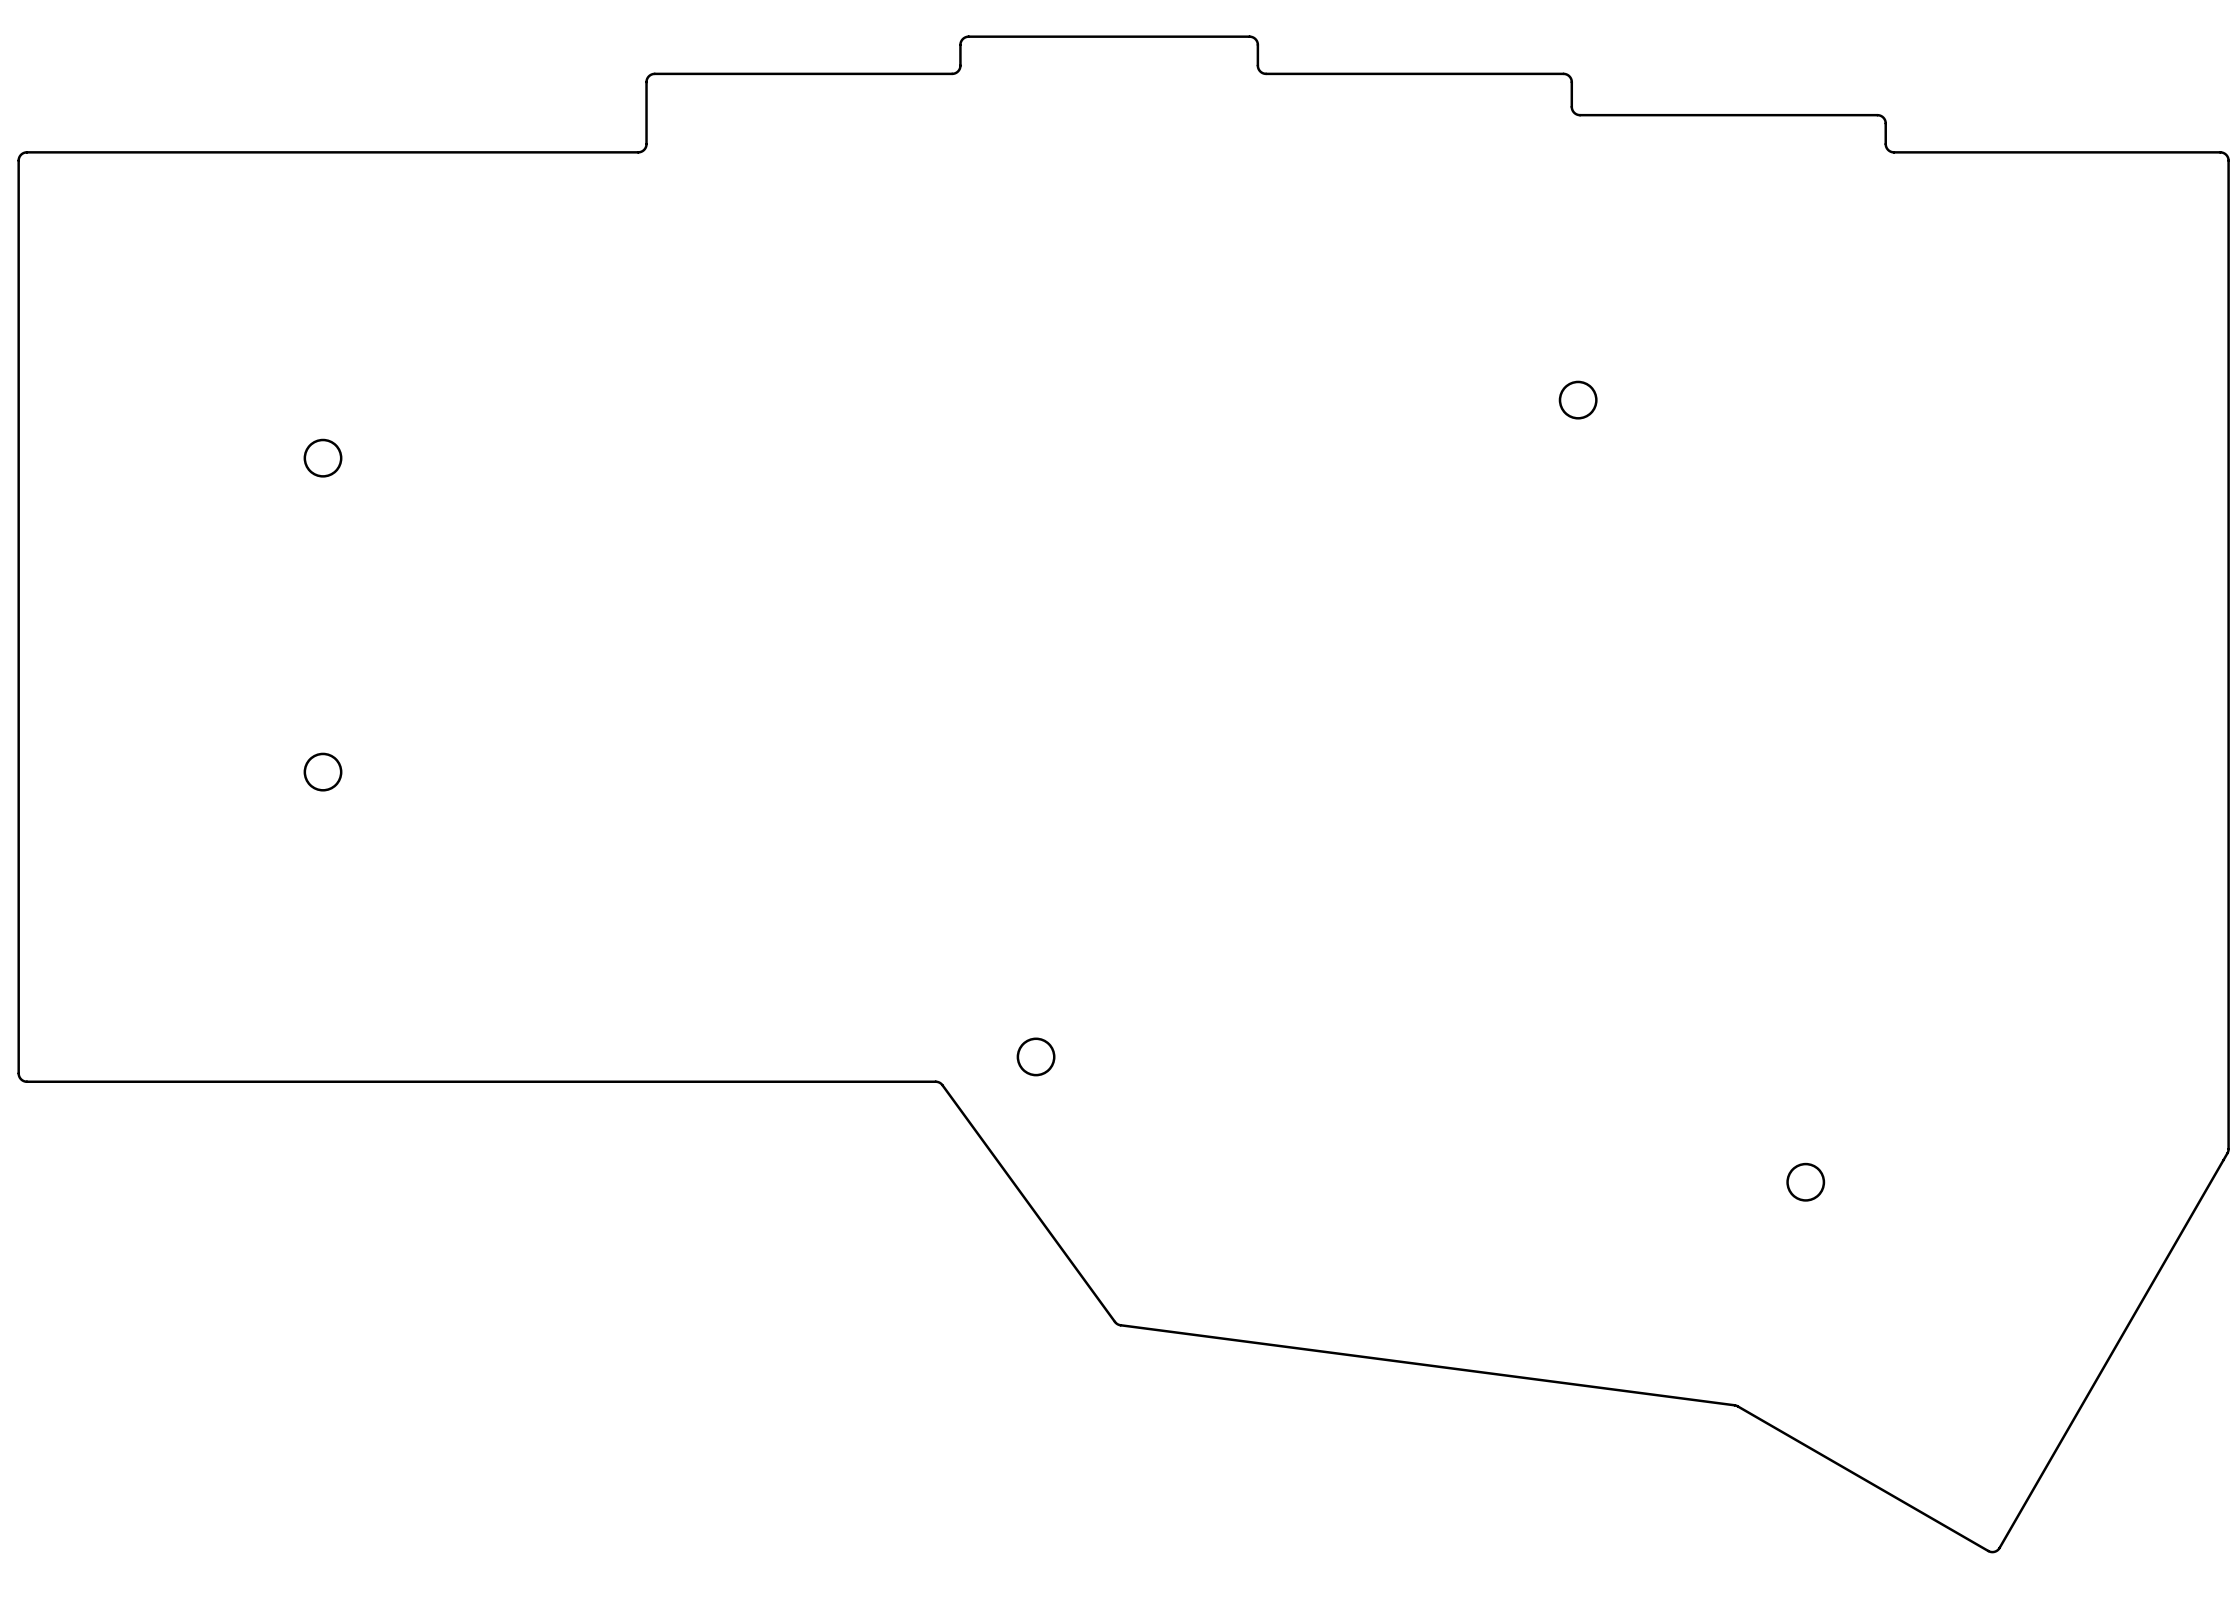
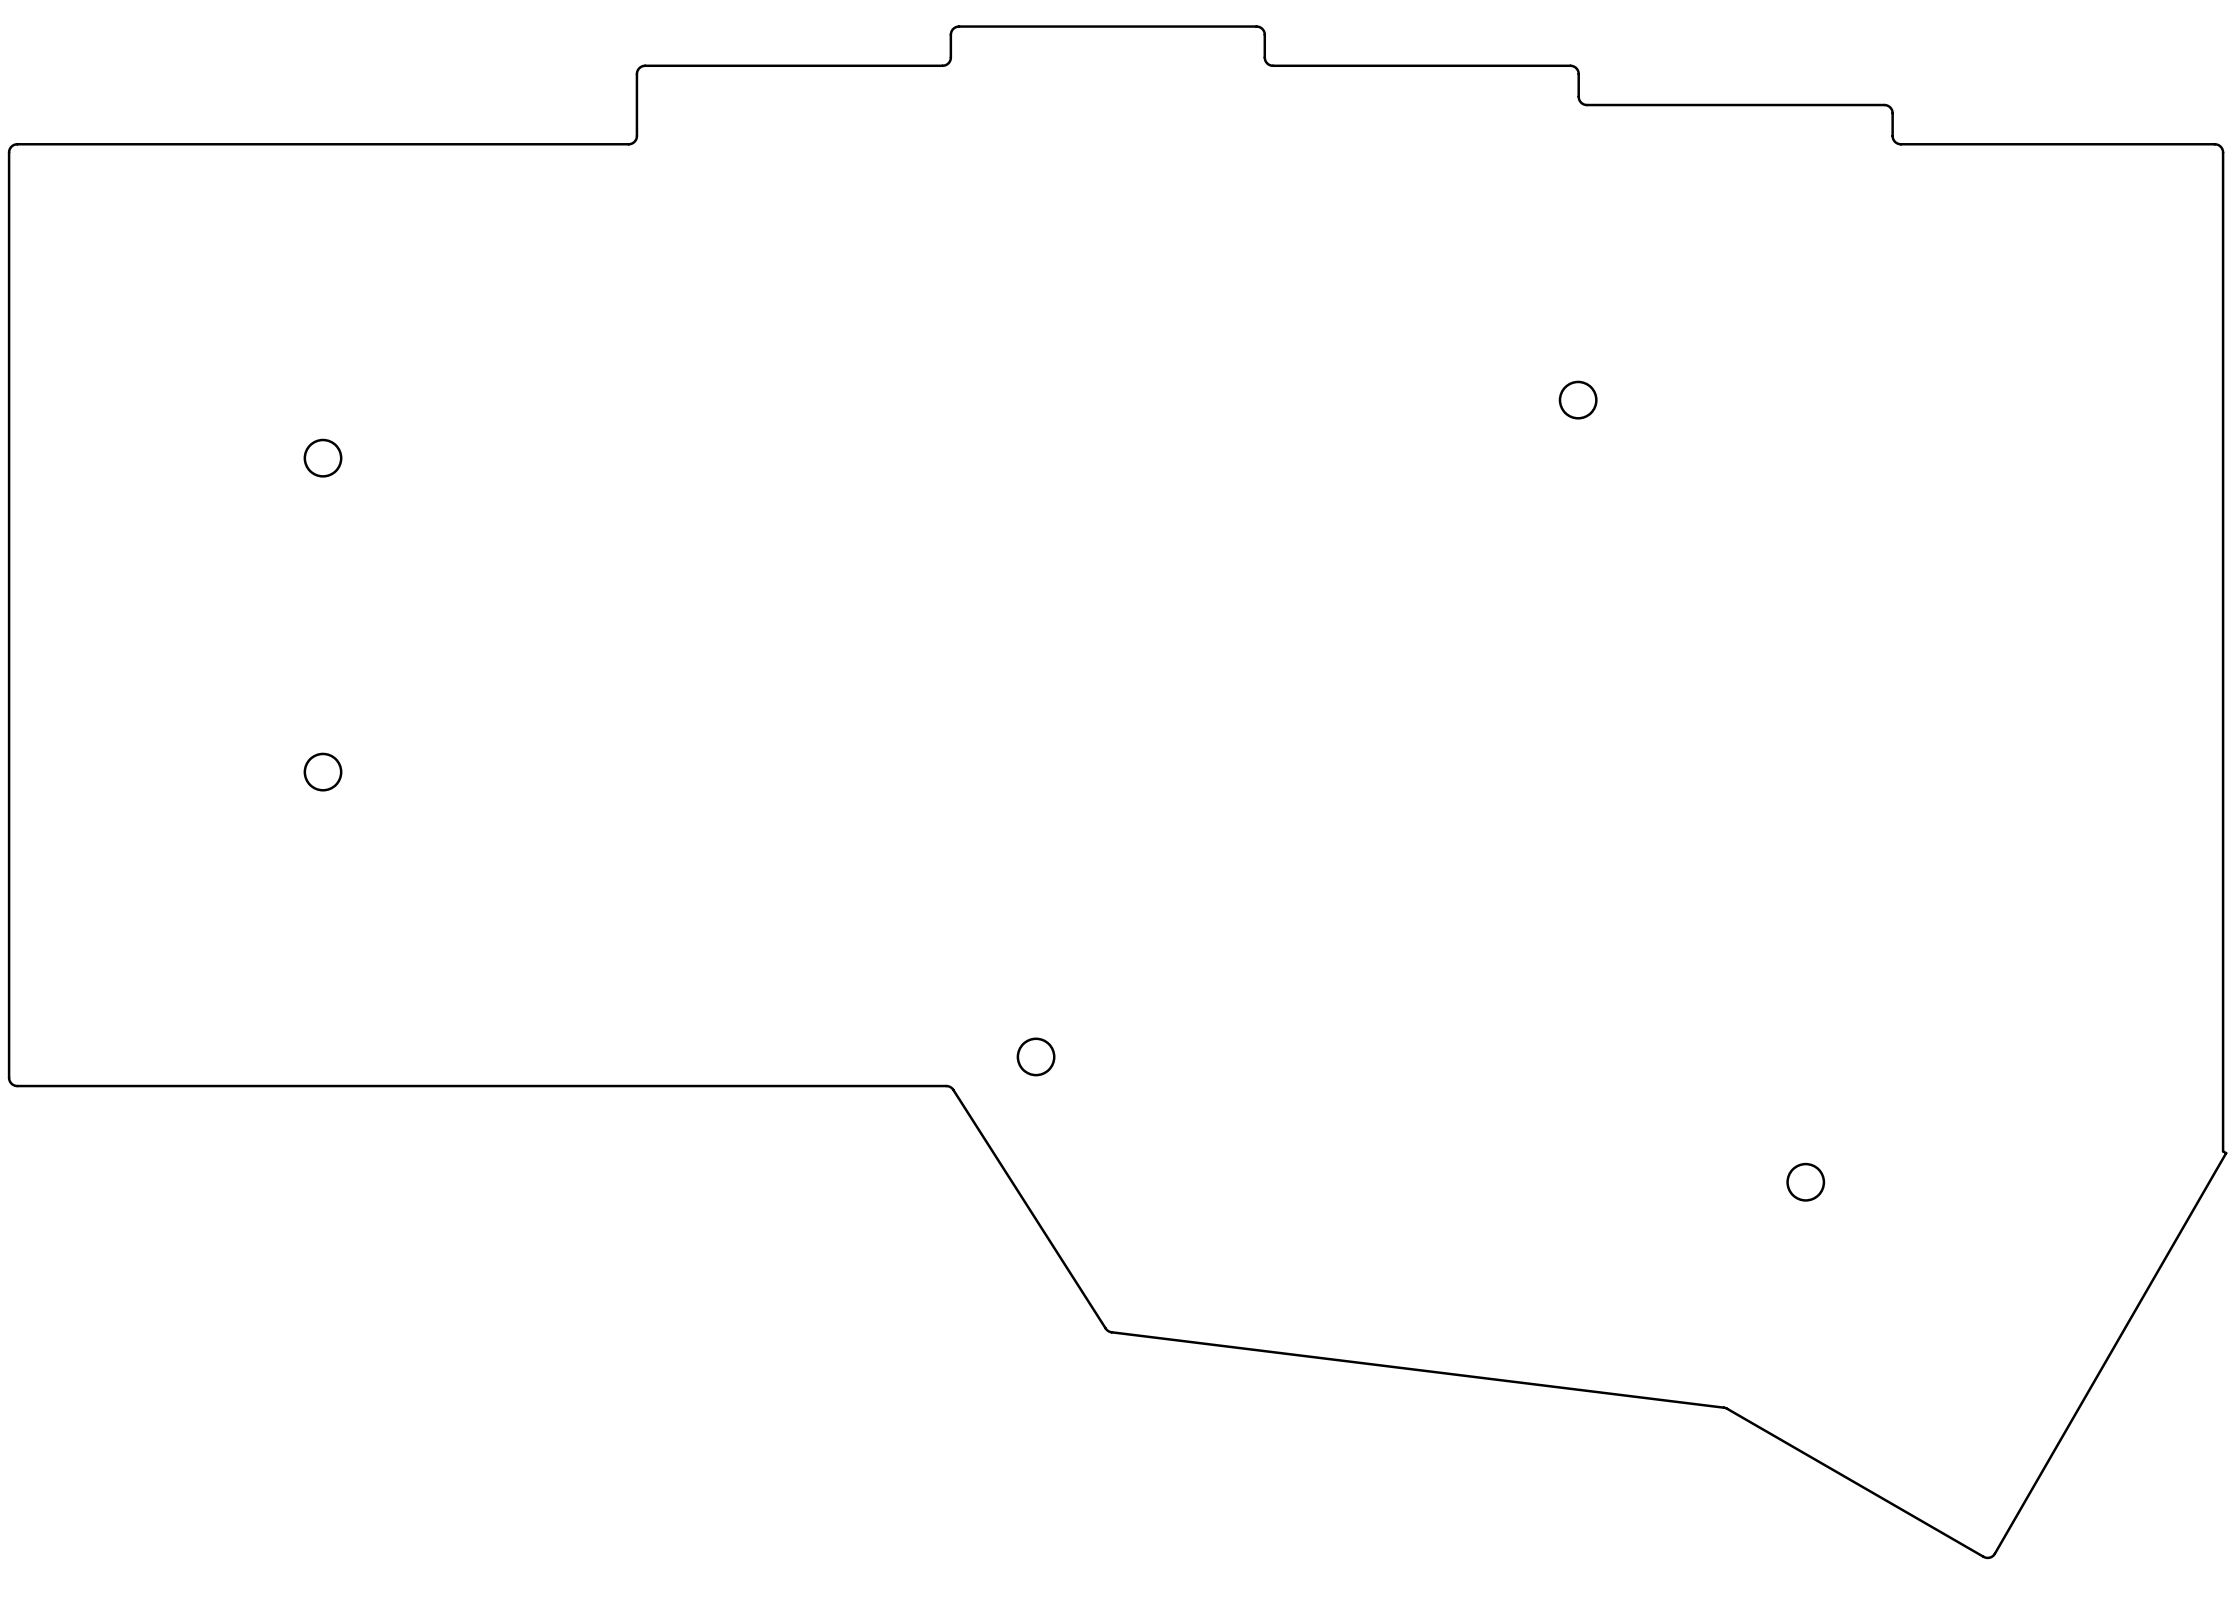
board edge: (968, 36) (1250, 36) (1257, 42) (1258, 68) (1266, 73) (1564, 73) (1571, 80) (1571, 107) (1577, 114) (1878, 115) (1885, 120) (1886, 146) (1892, 152) (2220, 152) (2226, 155) (2228, 160) (2228, 1150) (1997, 1550) (1988, 1551) (1735, 1405) (1118, 1324) (942, 1085) (937, 1081) (26, 1081) (20, 1078) (18, 1073) (18, 160) (21, 154) (26, 152) (639, 152) (644, 149) (646, 145) (646, 81) (651, 74) (953, 73) (960, 67) (961, 41) (968, 36) -> (959, 26) (951, 31) (950, 59) (943, 65) (642, 66) (637, 72) (636, 137) (634, 141) (629, 144) (17, 144) (11, 146) (9, 152) (9, 1077) (10, 1082) (17, 1086) (948, 1086) (953, 1089) (1109, 1331) (1724, 1407) (1983, 1556) (1992, 1556) (2226, 1153) (2223, 1151) (2223, 152) (2221, 147) (2214, 144) (1899, 144) (1893, 139) (1892, 111) (1885, 105) (1585, 104) (1579, 99) (1578, 71) (1571, 65) (1271, 65) (1265, 60) (1264, 32) (1257, 26) (959, 26)

